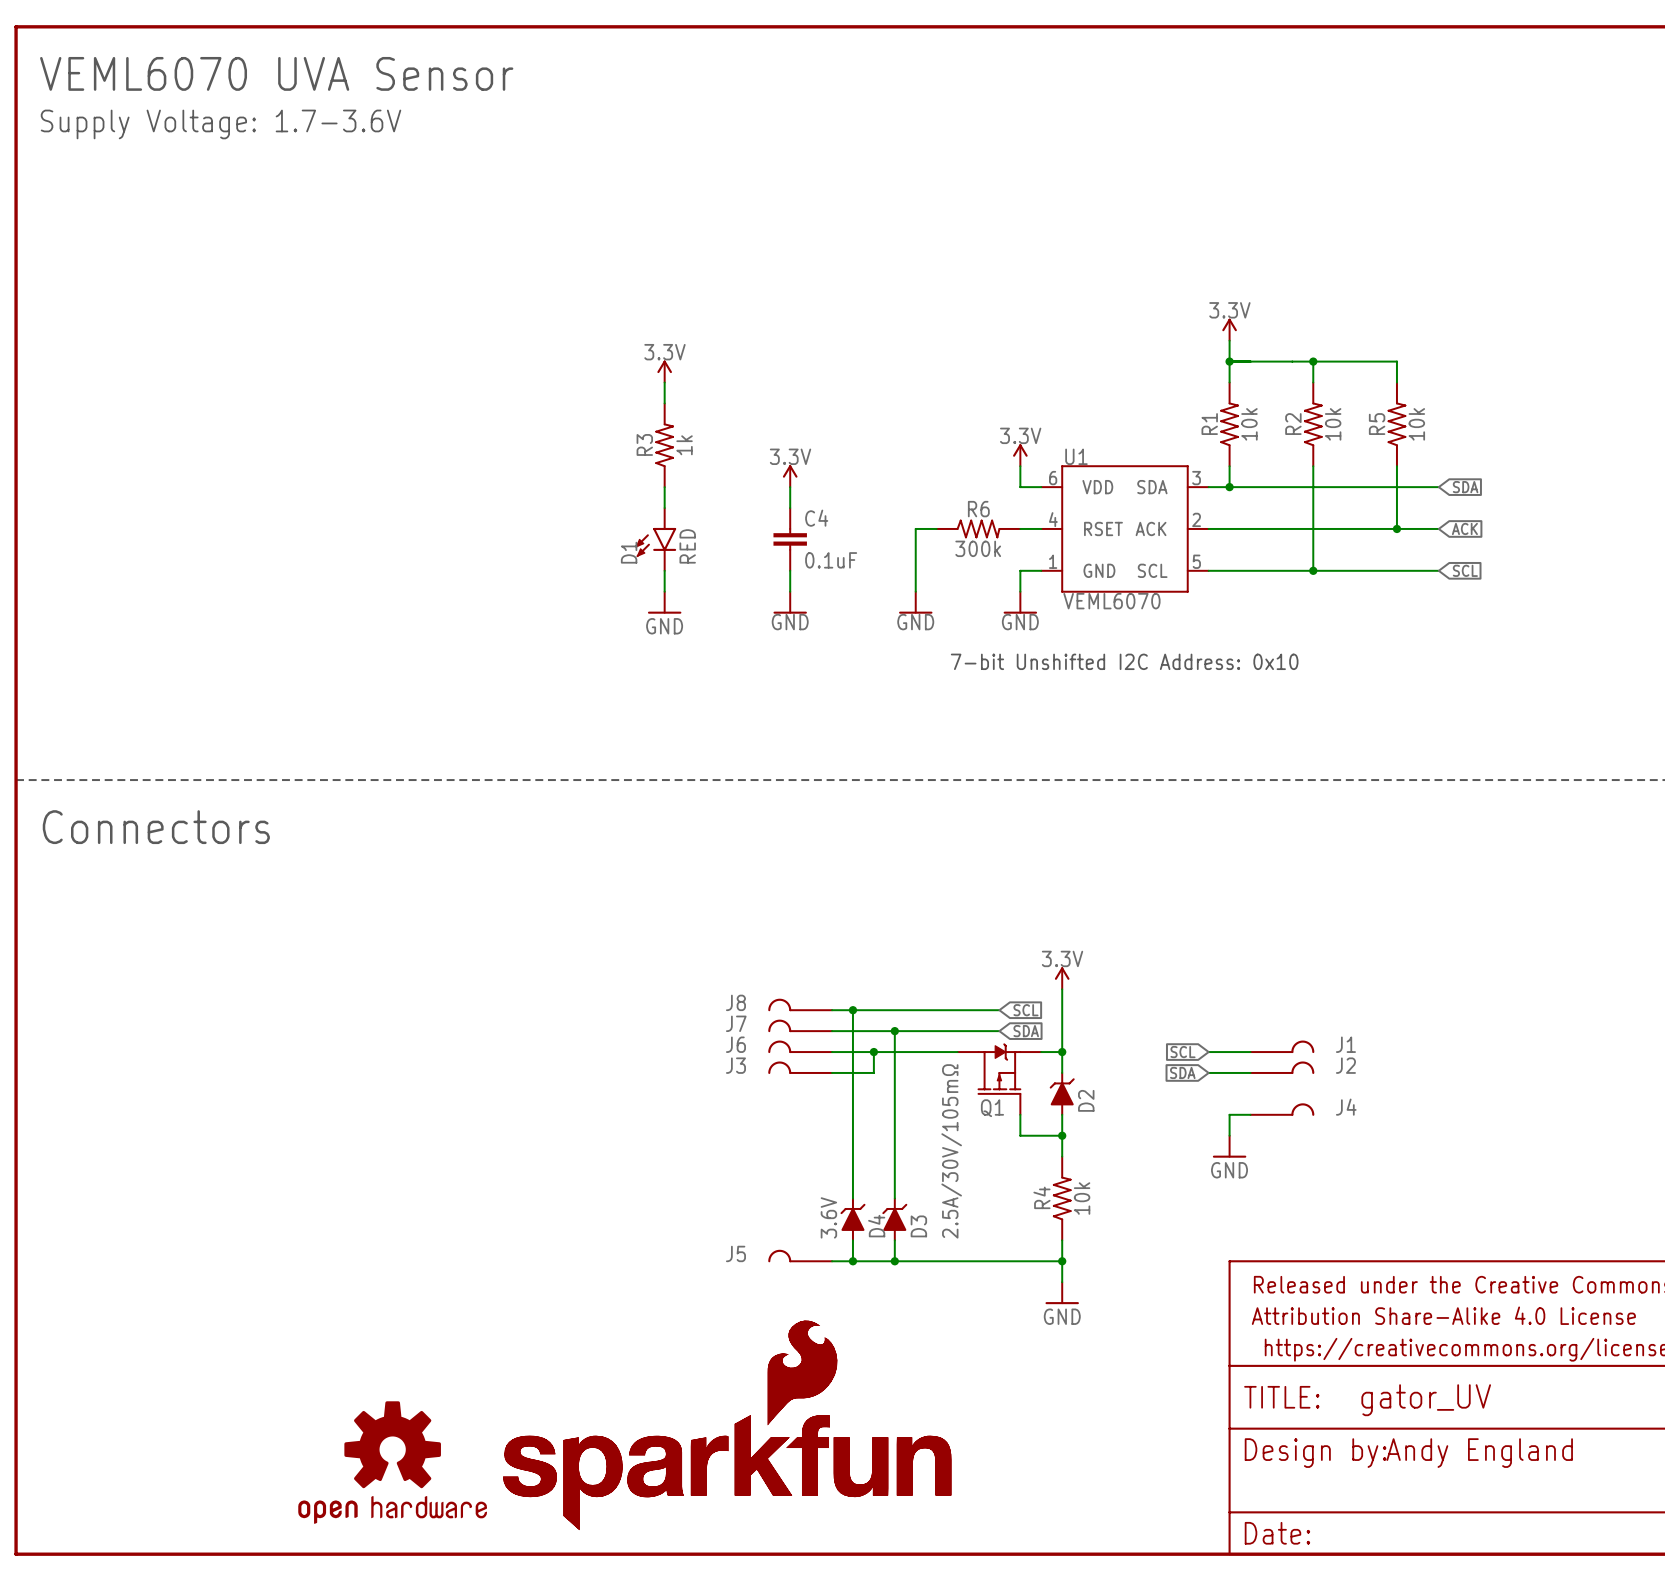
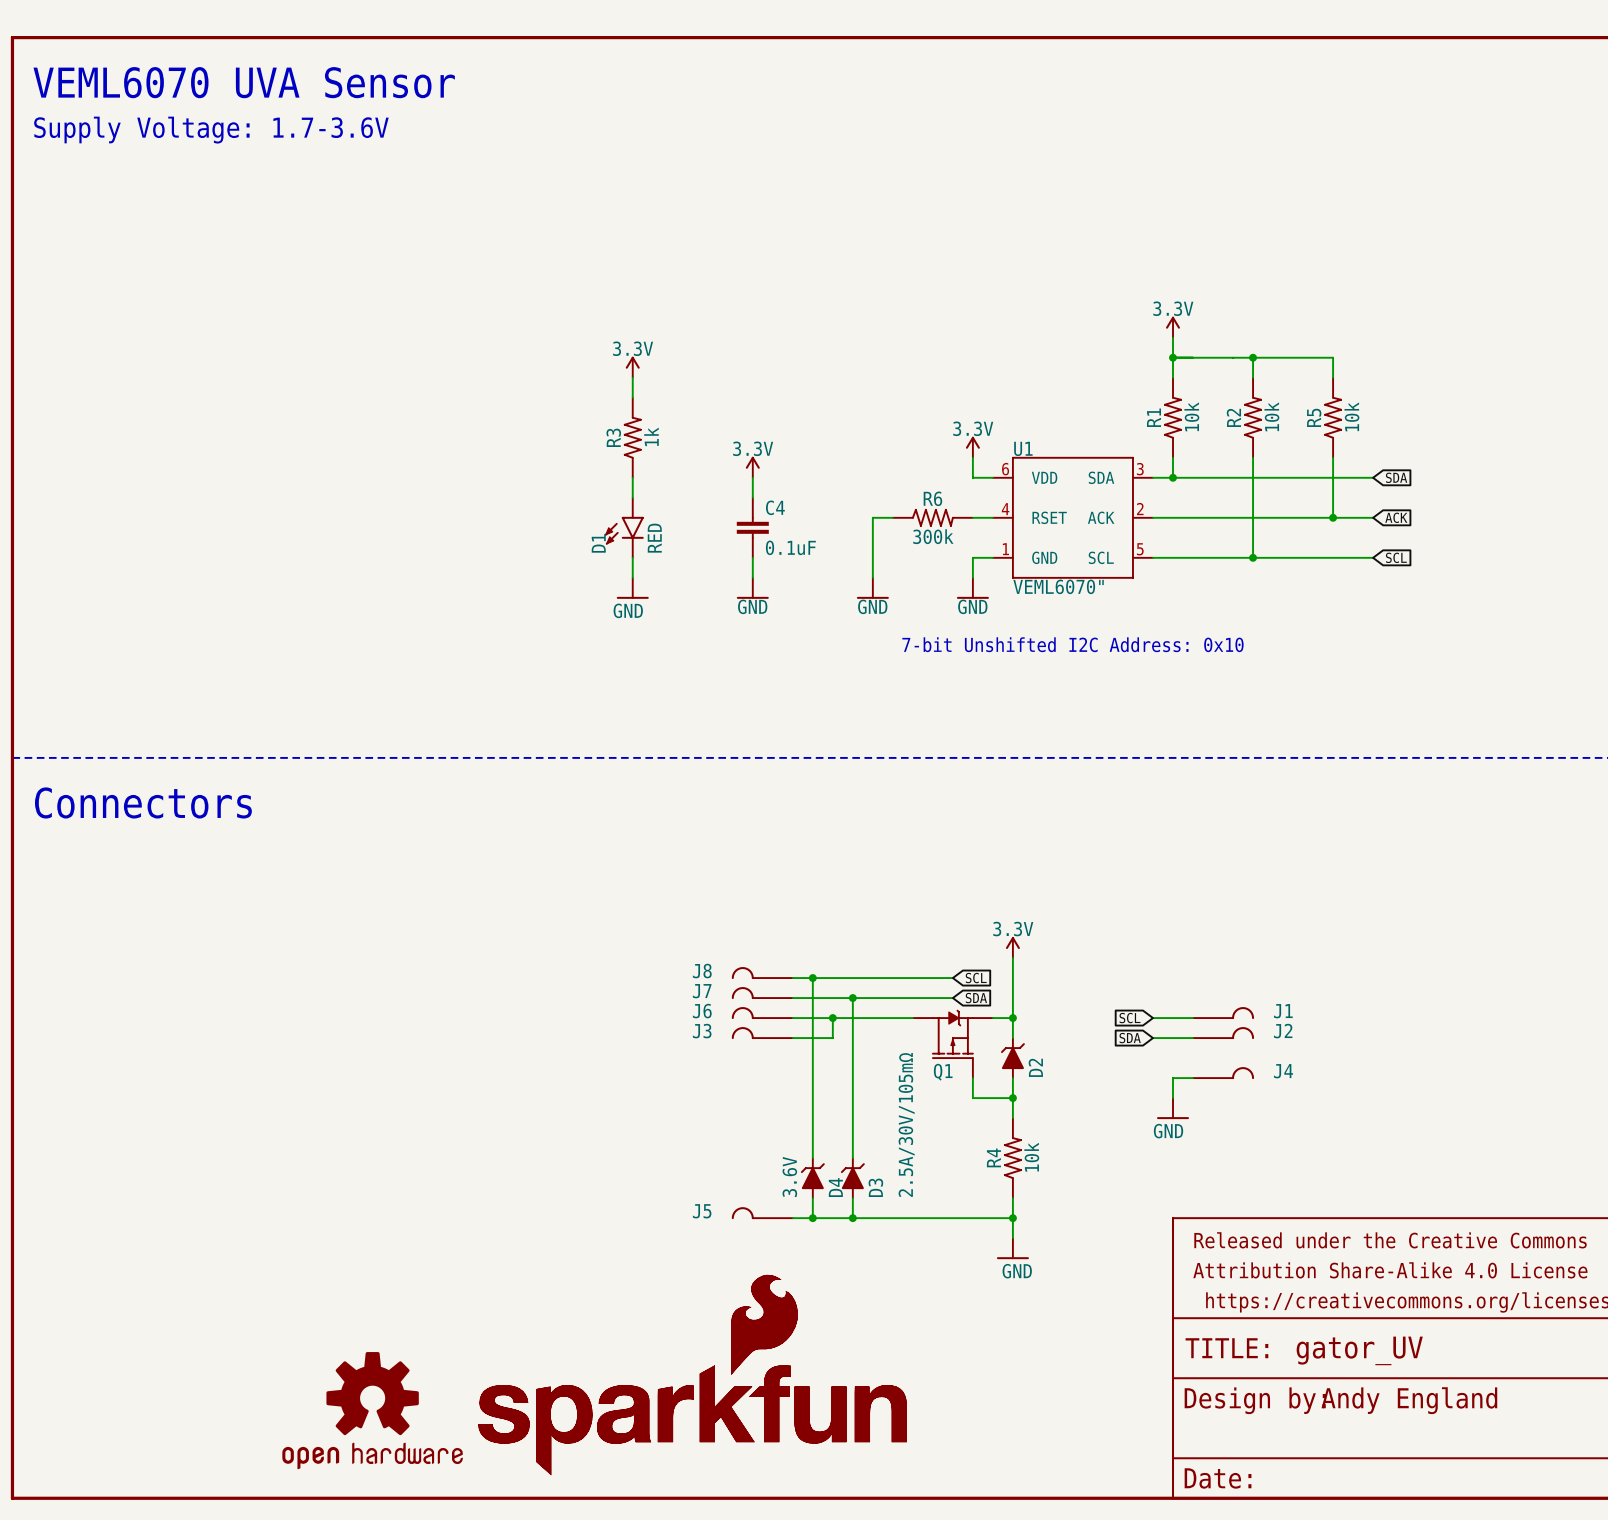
U1 value: VEML6070 (1111, 601) -> VEML6070" (1058, 586)

